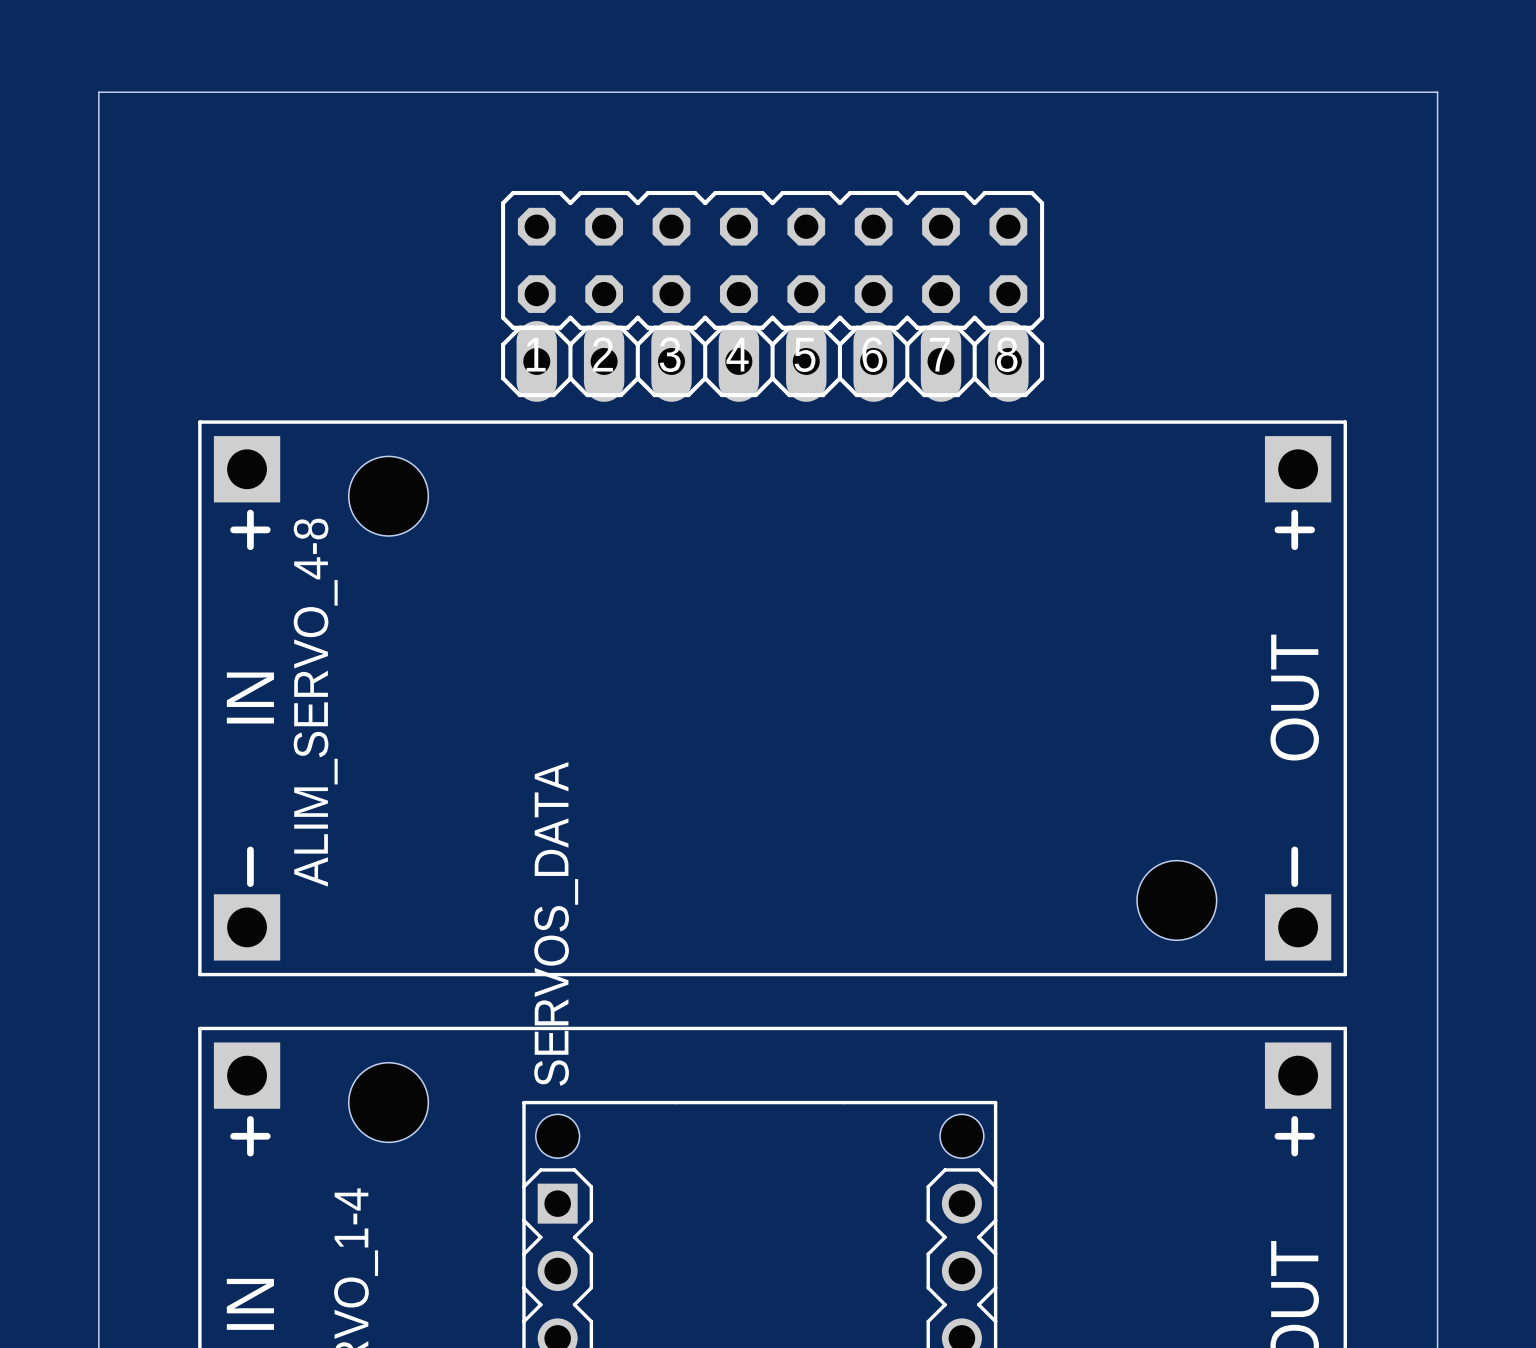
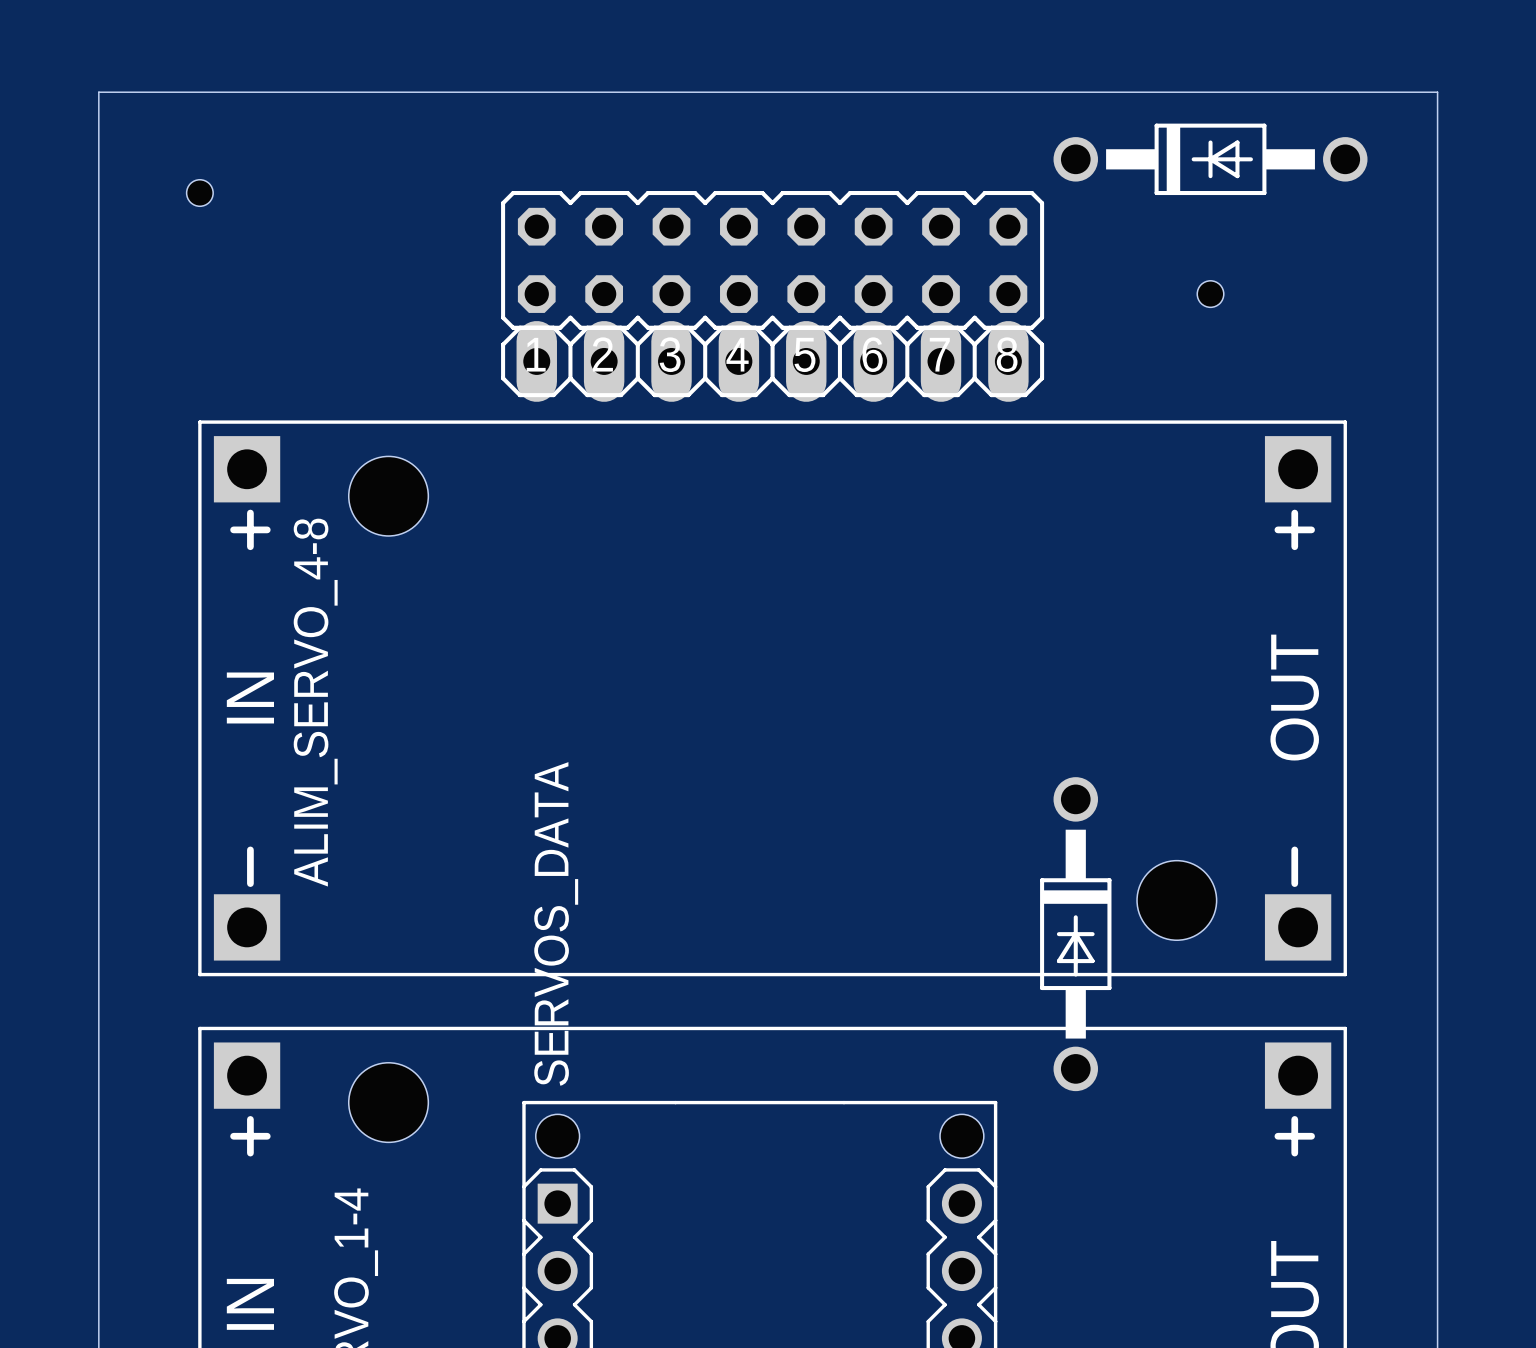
part: none -> (1210, 159)
hole: none -> (199, 193)
hole: none -> (1210, 294)
part: none -> (1075, 934)

